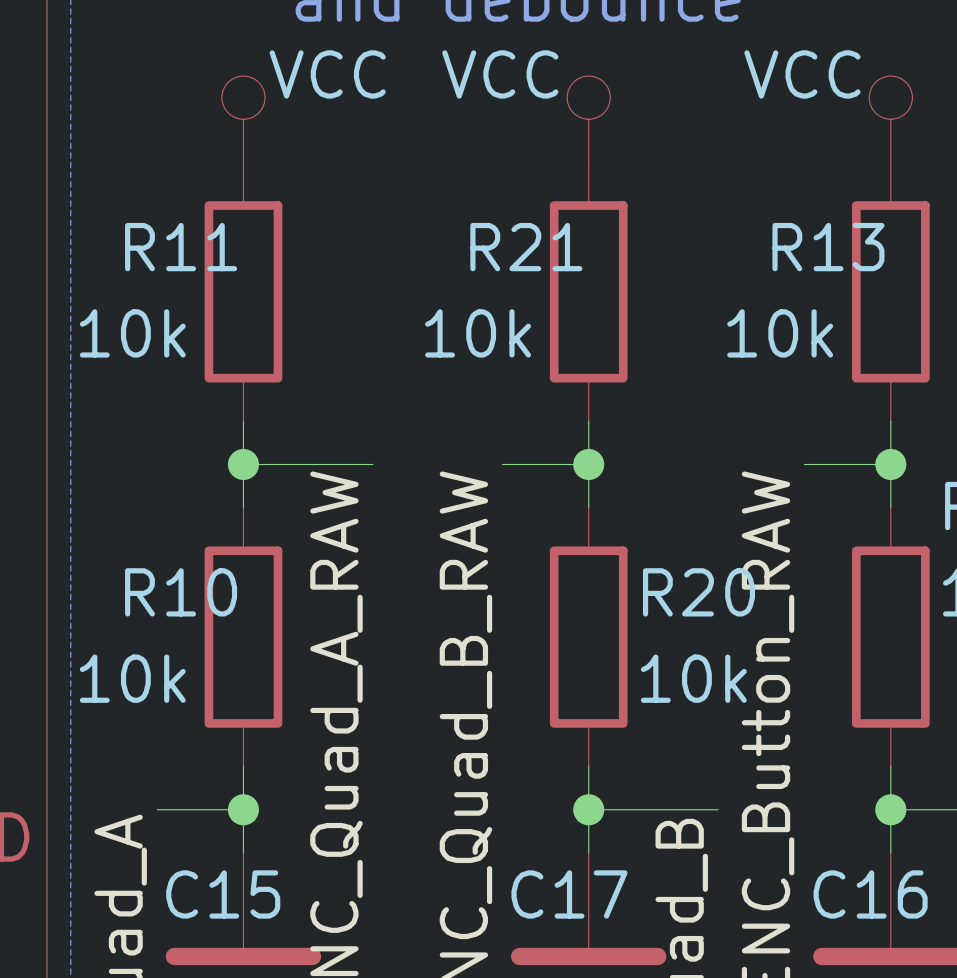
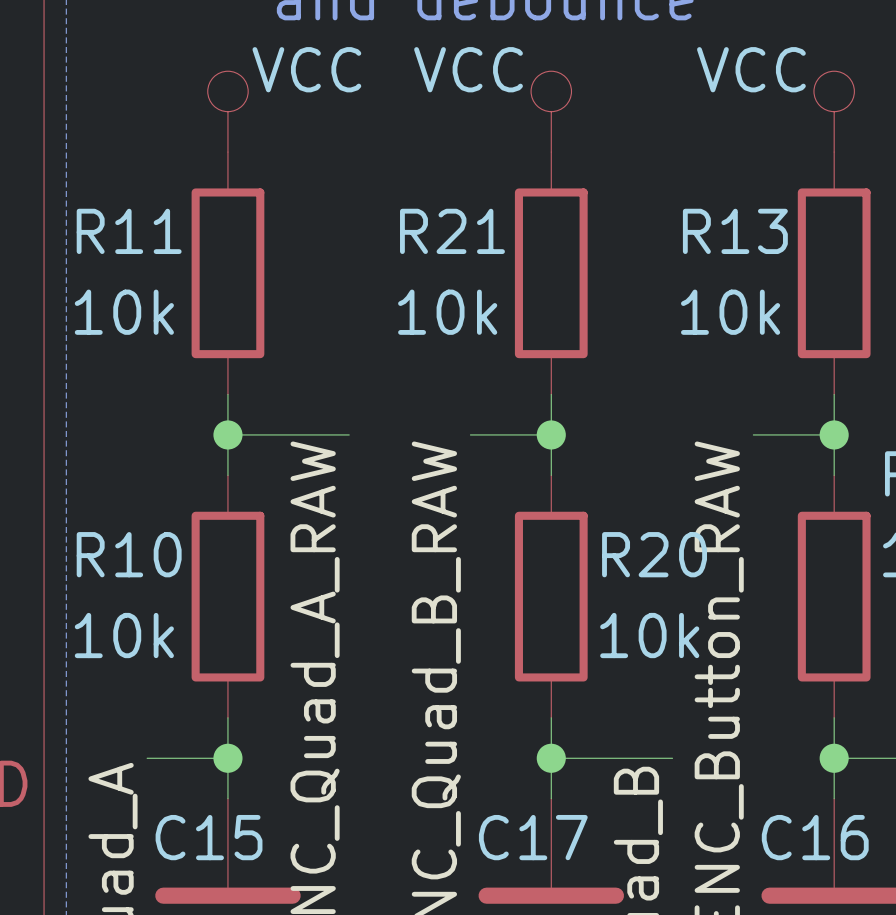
R11 name position: R11 (181, 247) -> R11 (129, 231)
R21 name position: R21 (526, 247) -> R21 (452, 231)
R13 name position: R13 (828, 247) -> R13 (735, 231)
R10 name position: R10 (181, 592) -> R10 (129, 554)

